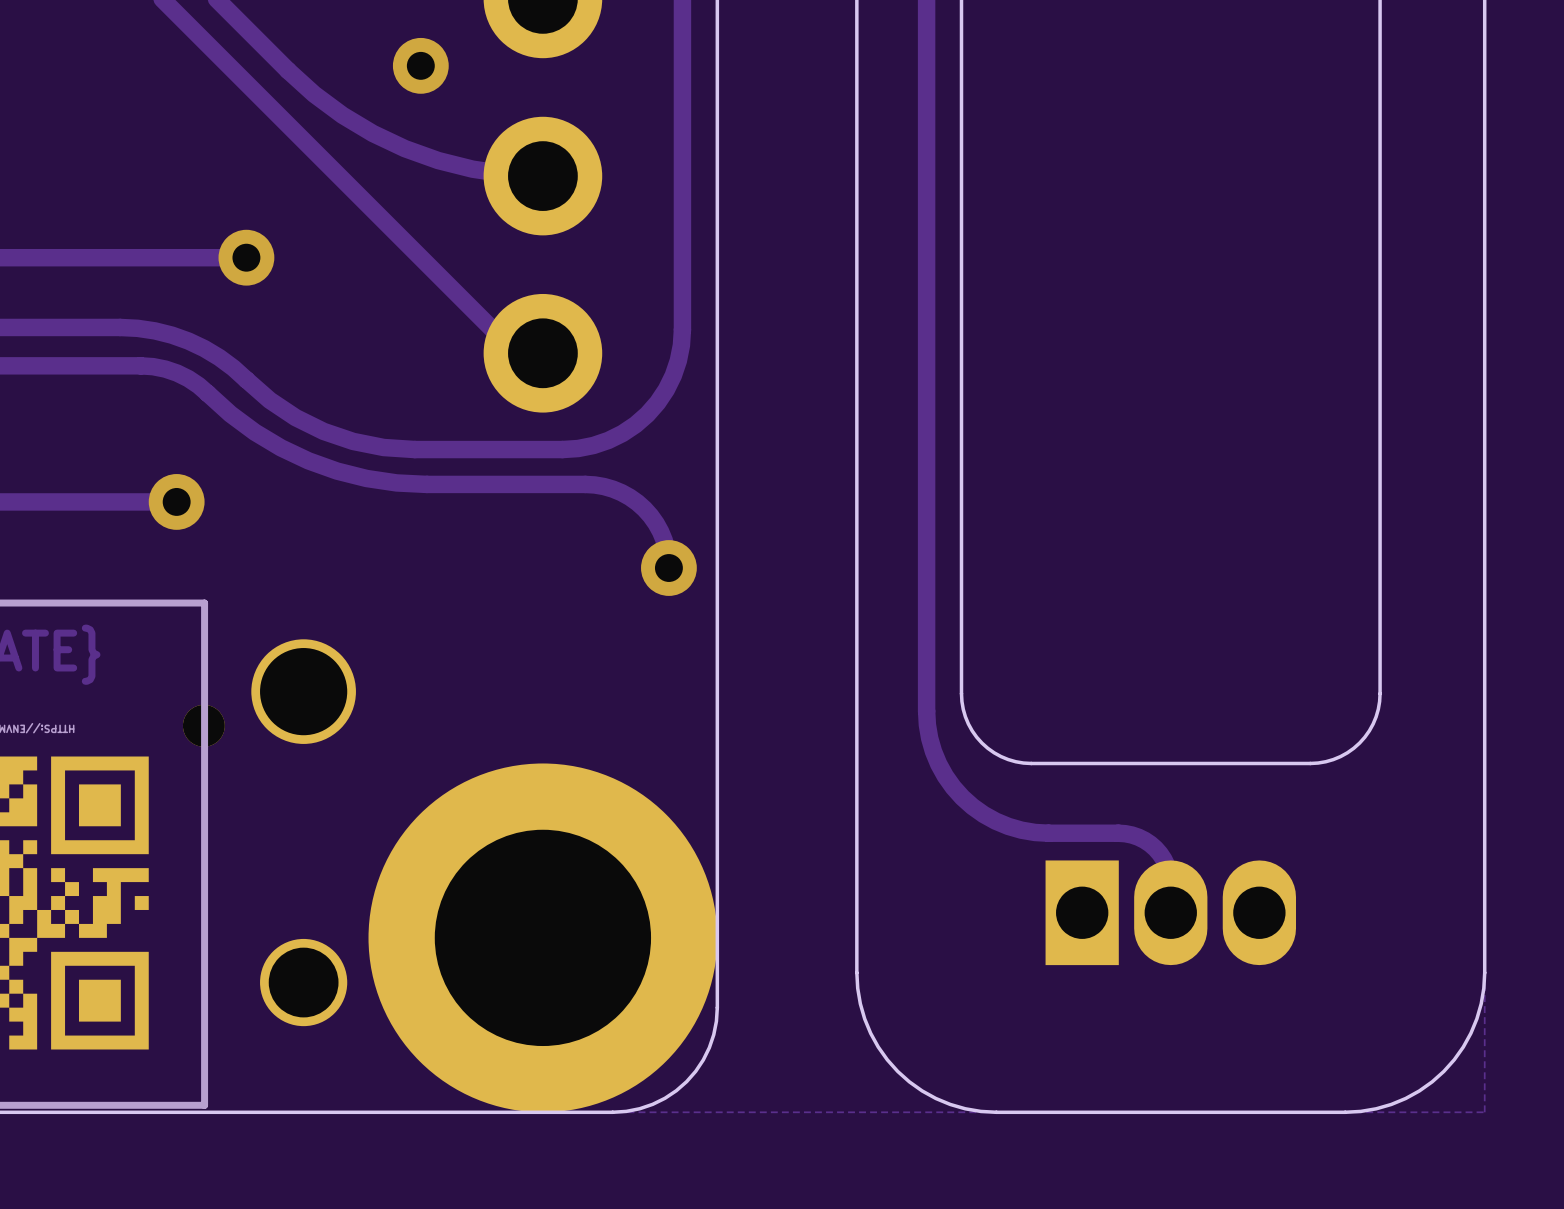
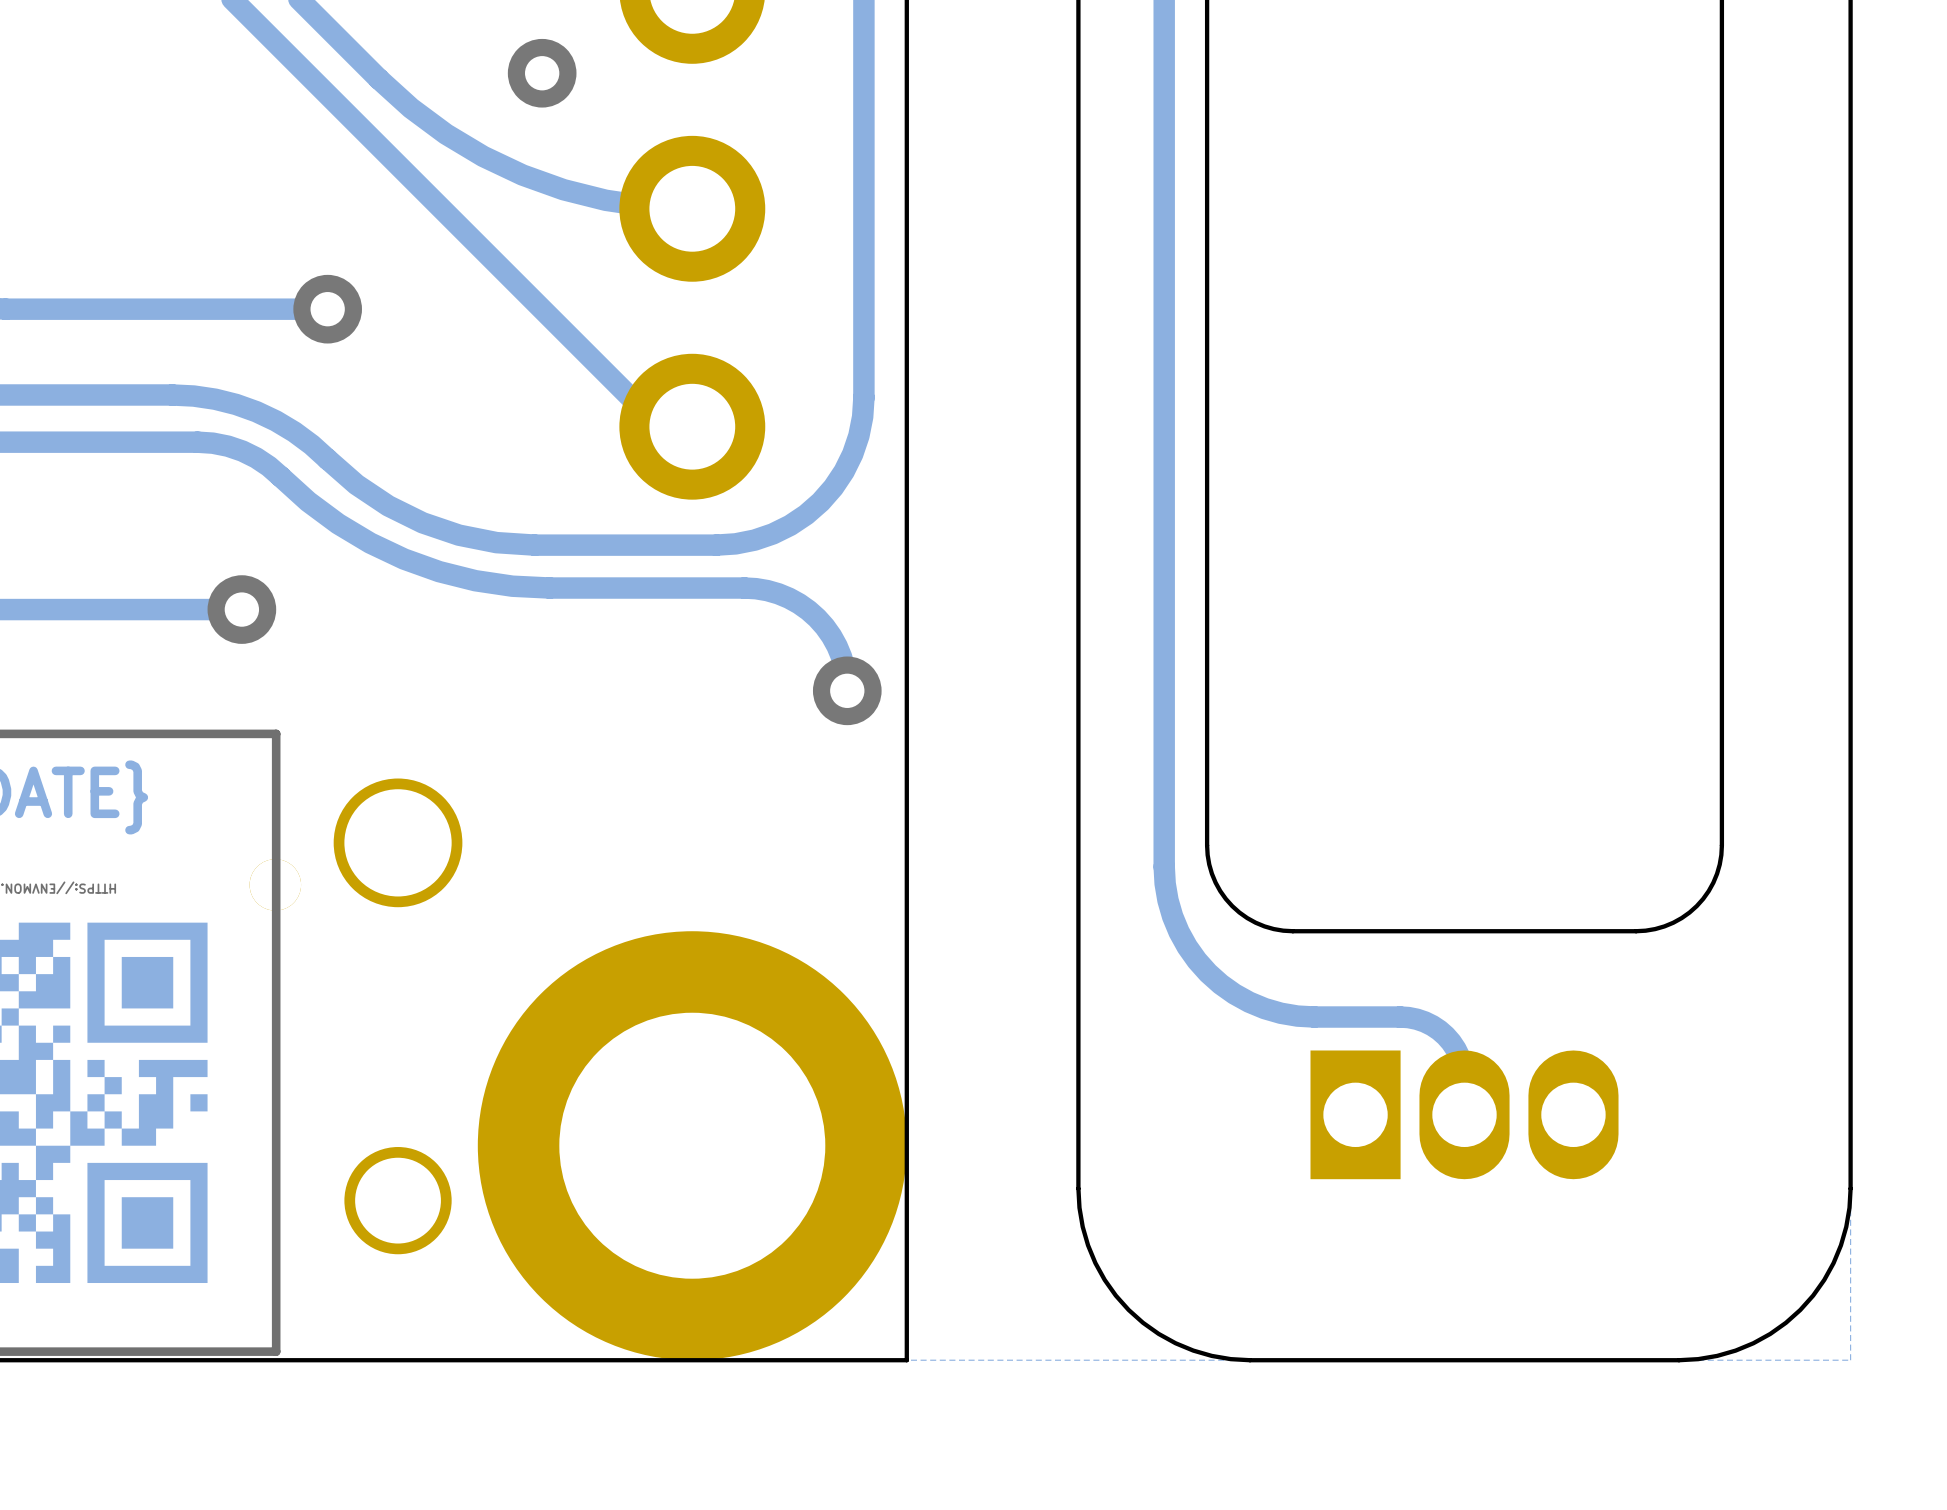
board edge: (717, 1007) (716, 1021) (709, 1047) (703, 1059) (686, 1081) (676, 1090) (652, 1104) (626, 1111) (612, 1112) -> (906, 1231) (906, 1360) (778, 1360)

